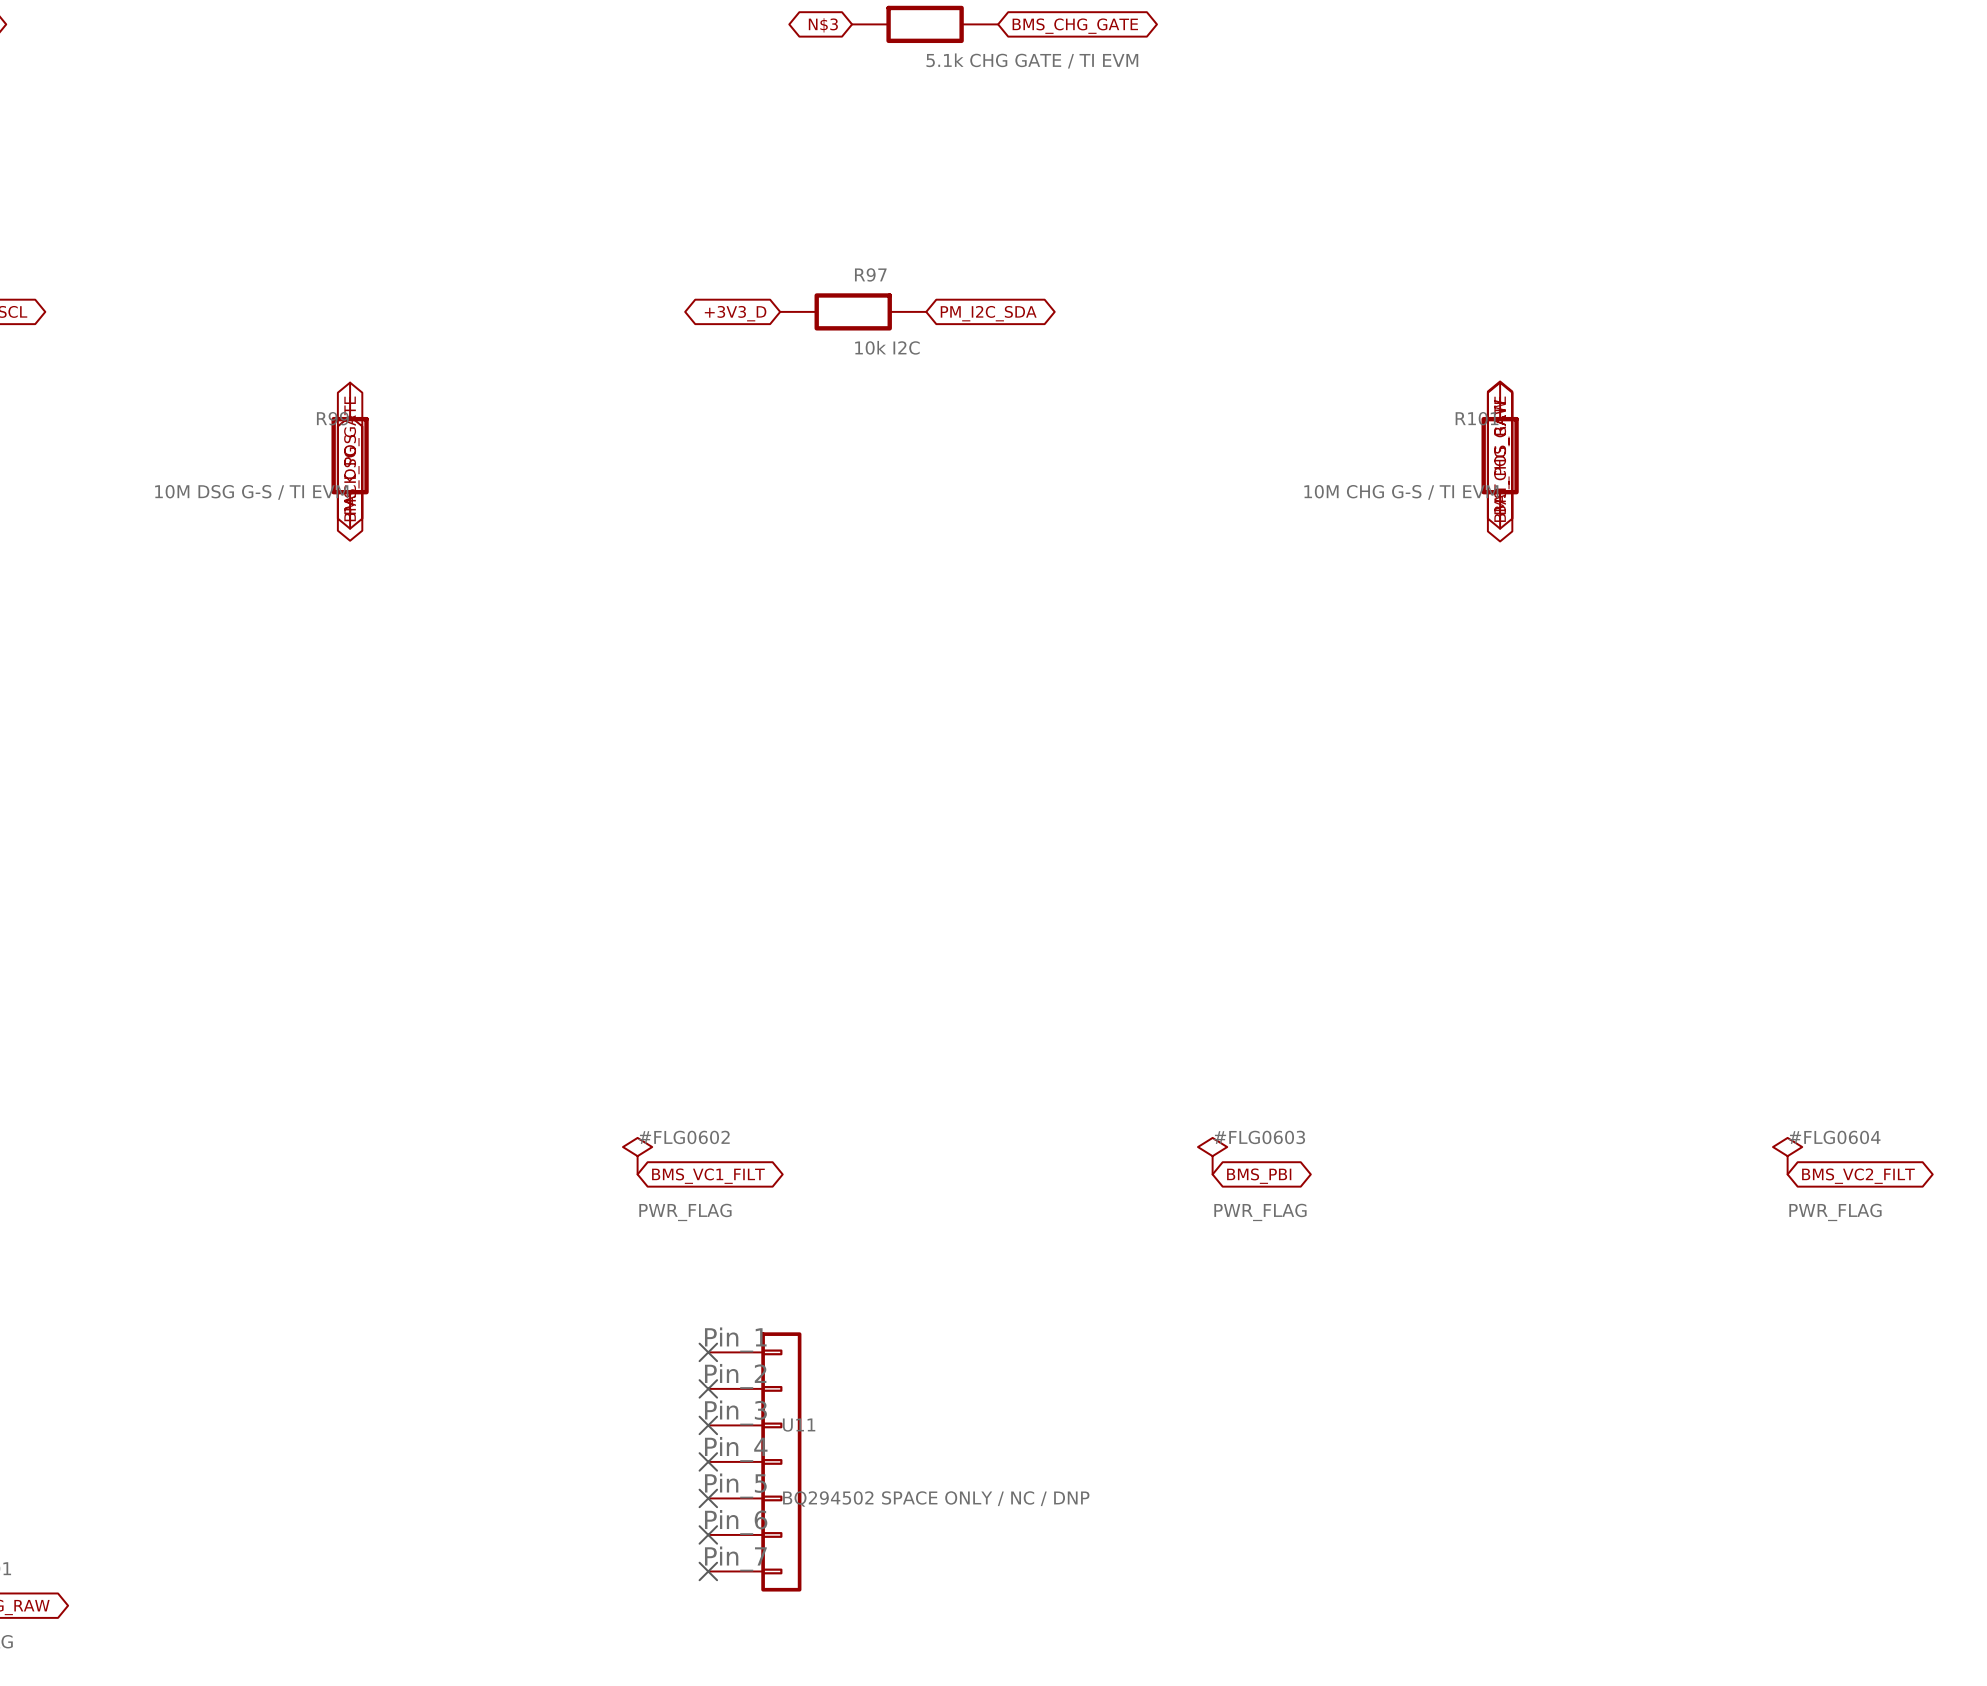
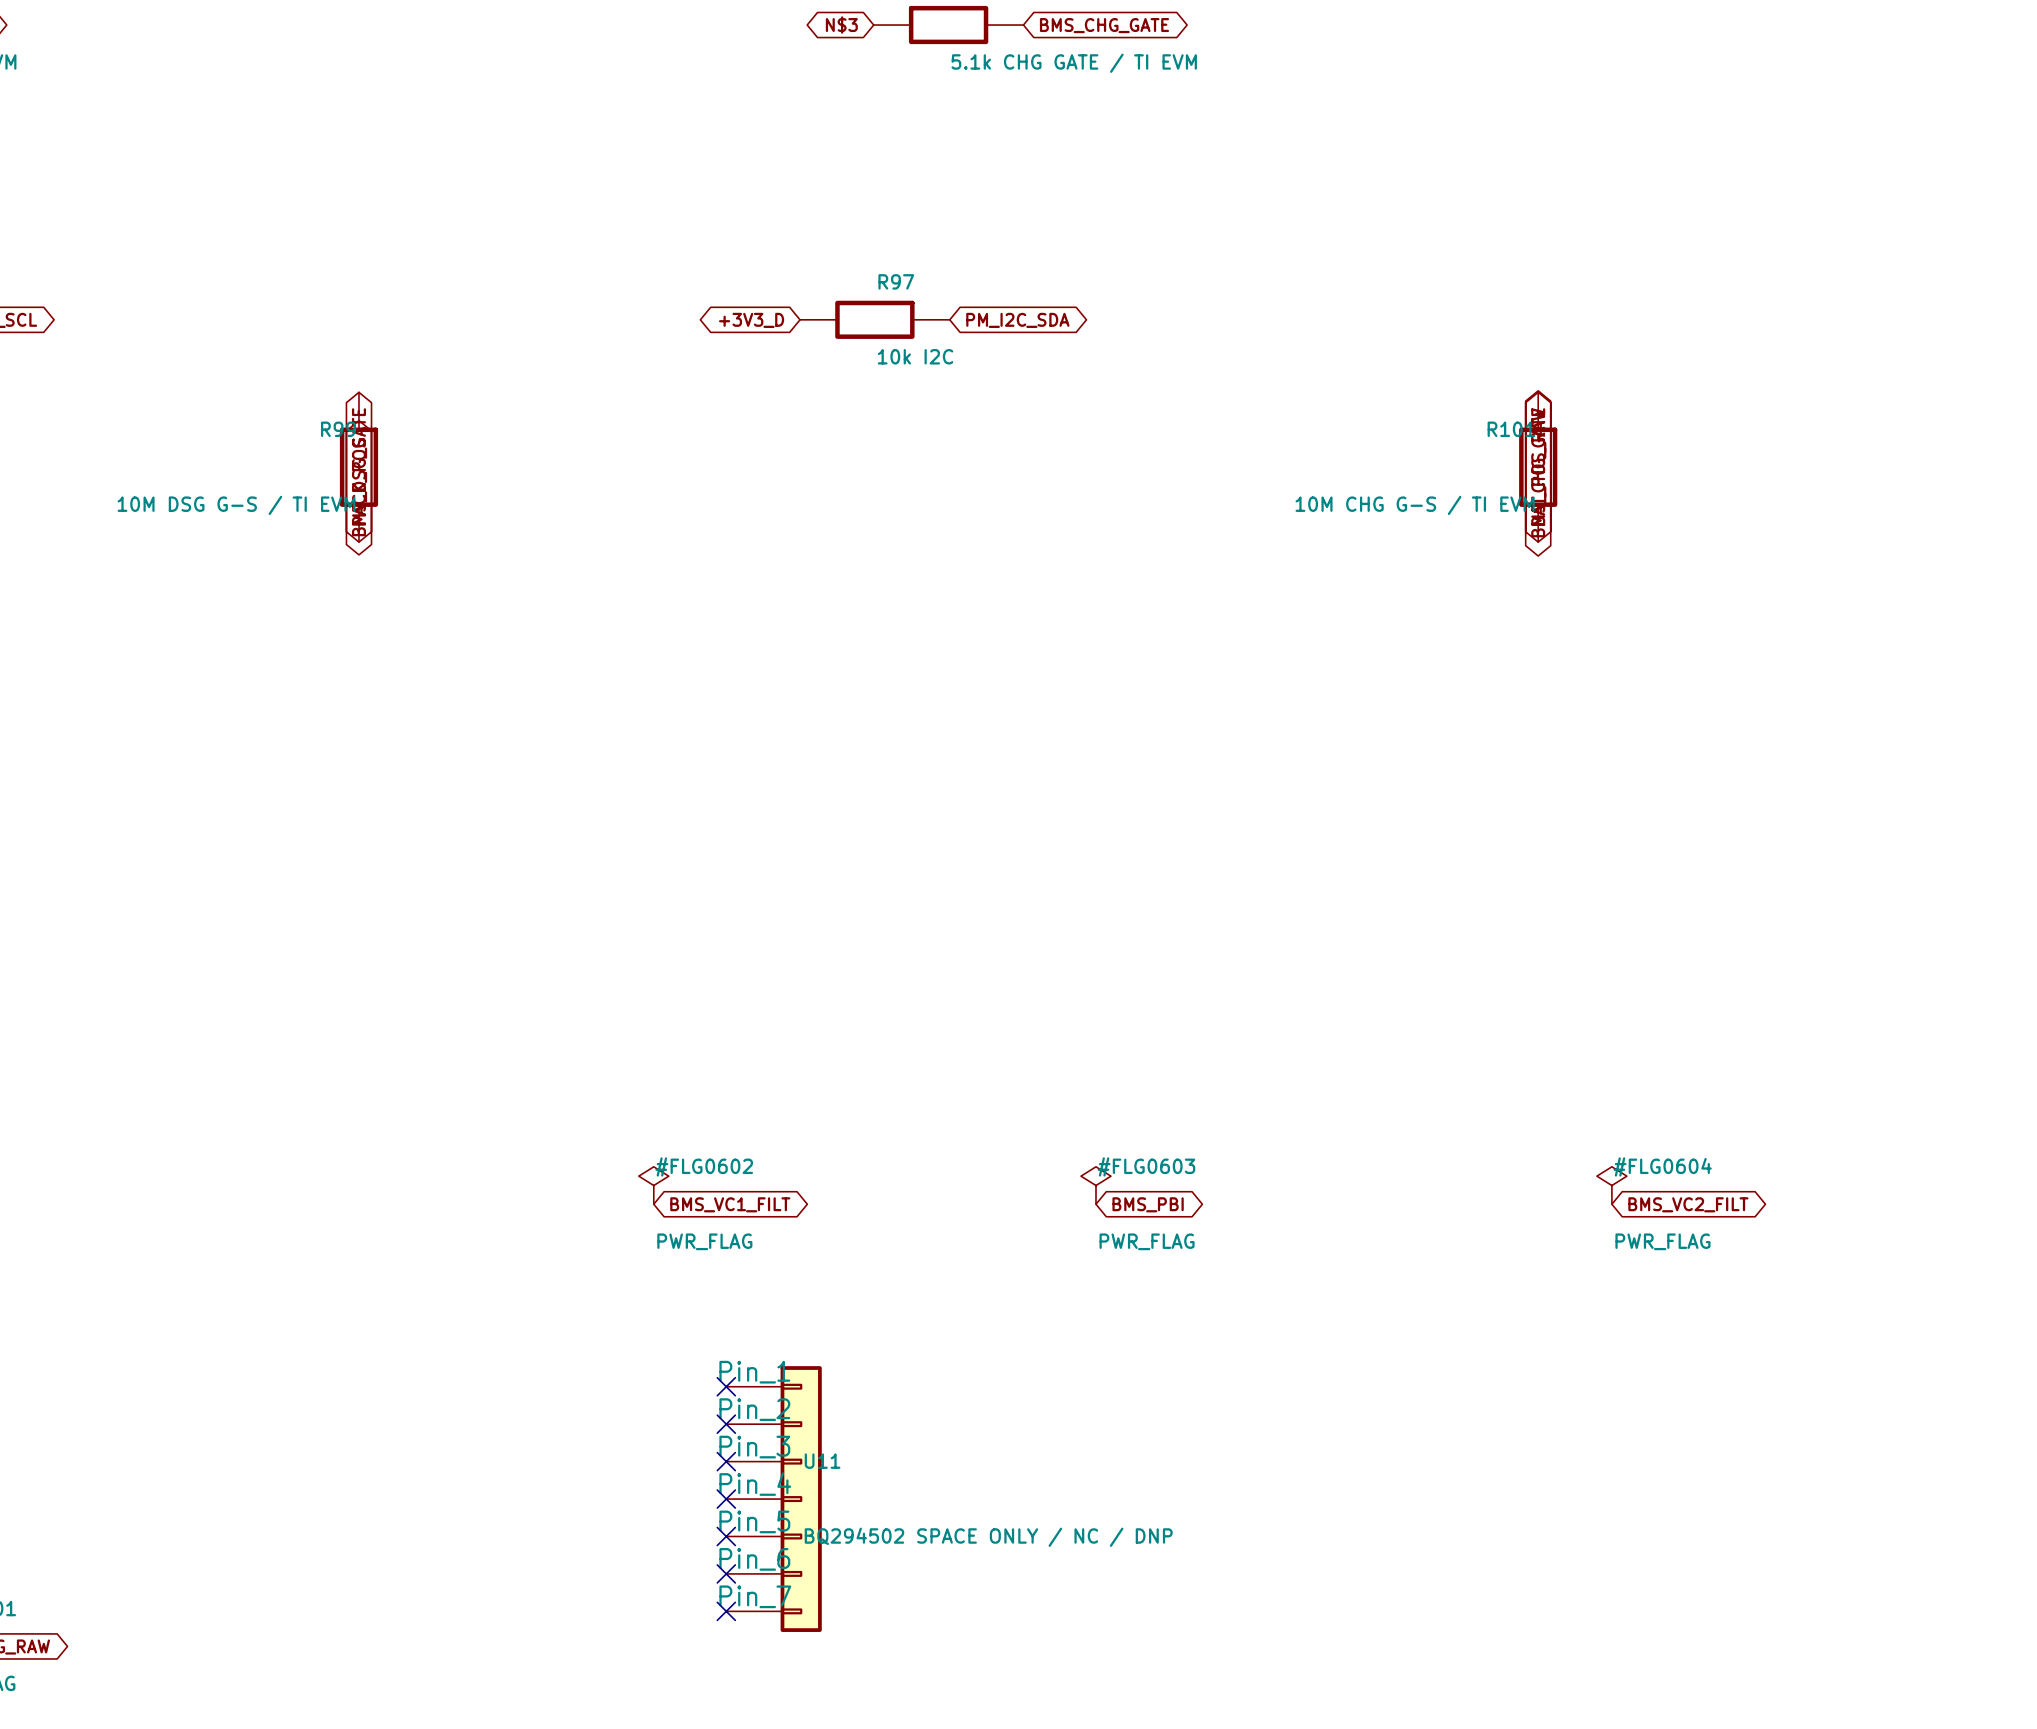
#FLG0603 position: PWR_FLAG (1212, 1156) -> PWR_FLAG (1095, 1185)
#FLG0604 position: PWR_FLAG (1787, 1156) -> PWR_FLAG (1611, 1185)
global label position: BMS_PBI (1259, 1176) -> BMS_PBI (1148, 1204)
global label position: BMS_VC2_FILT (1858, 1176) -> BMS_VC2_FILT (1688, 1204)

